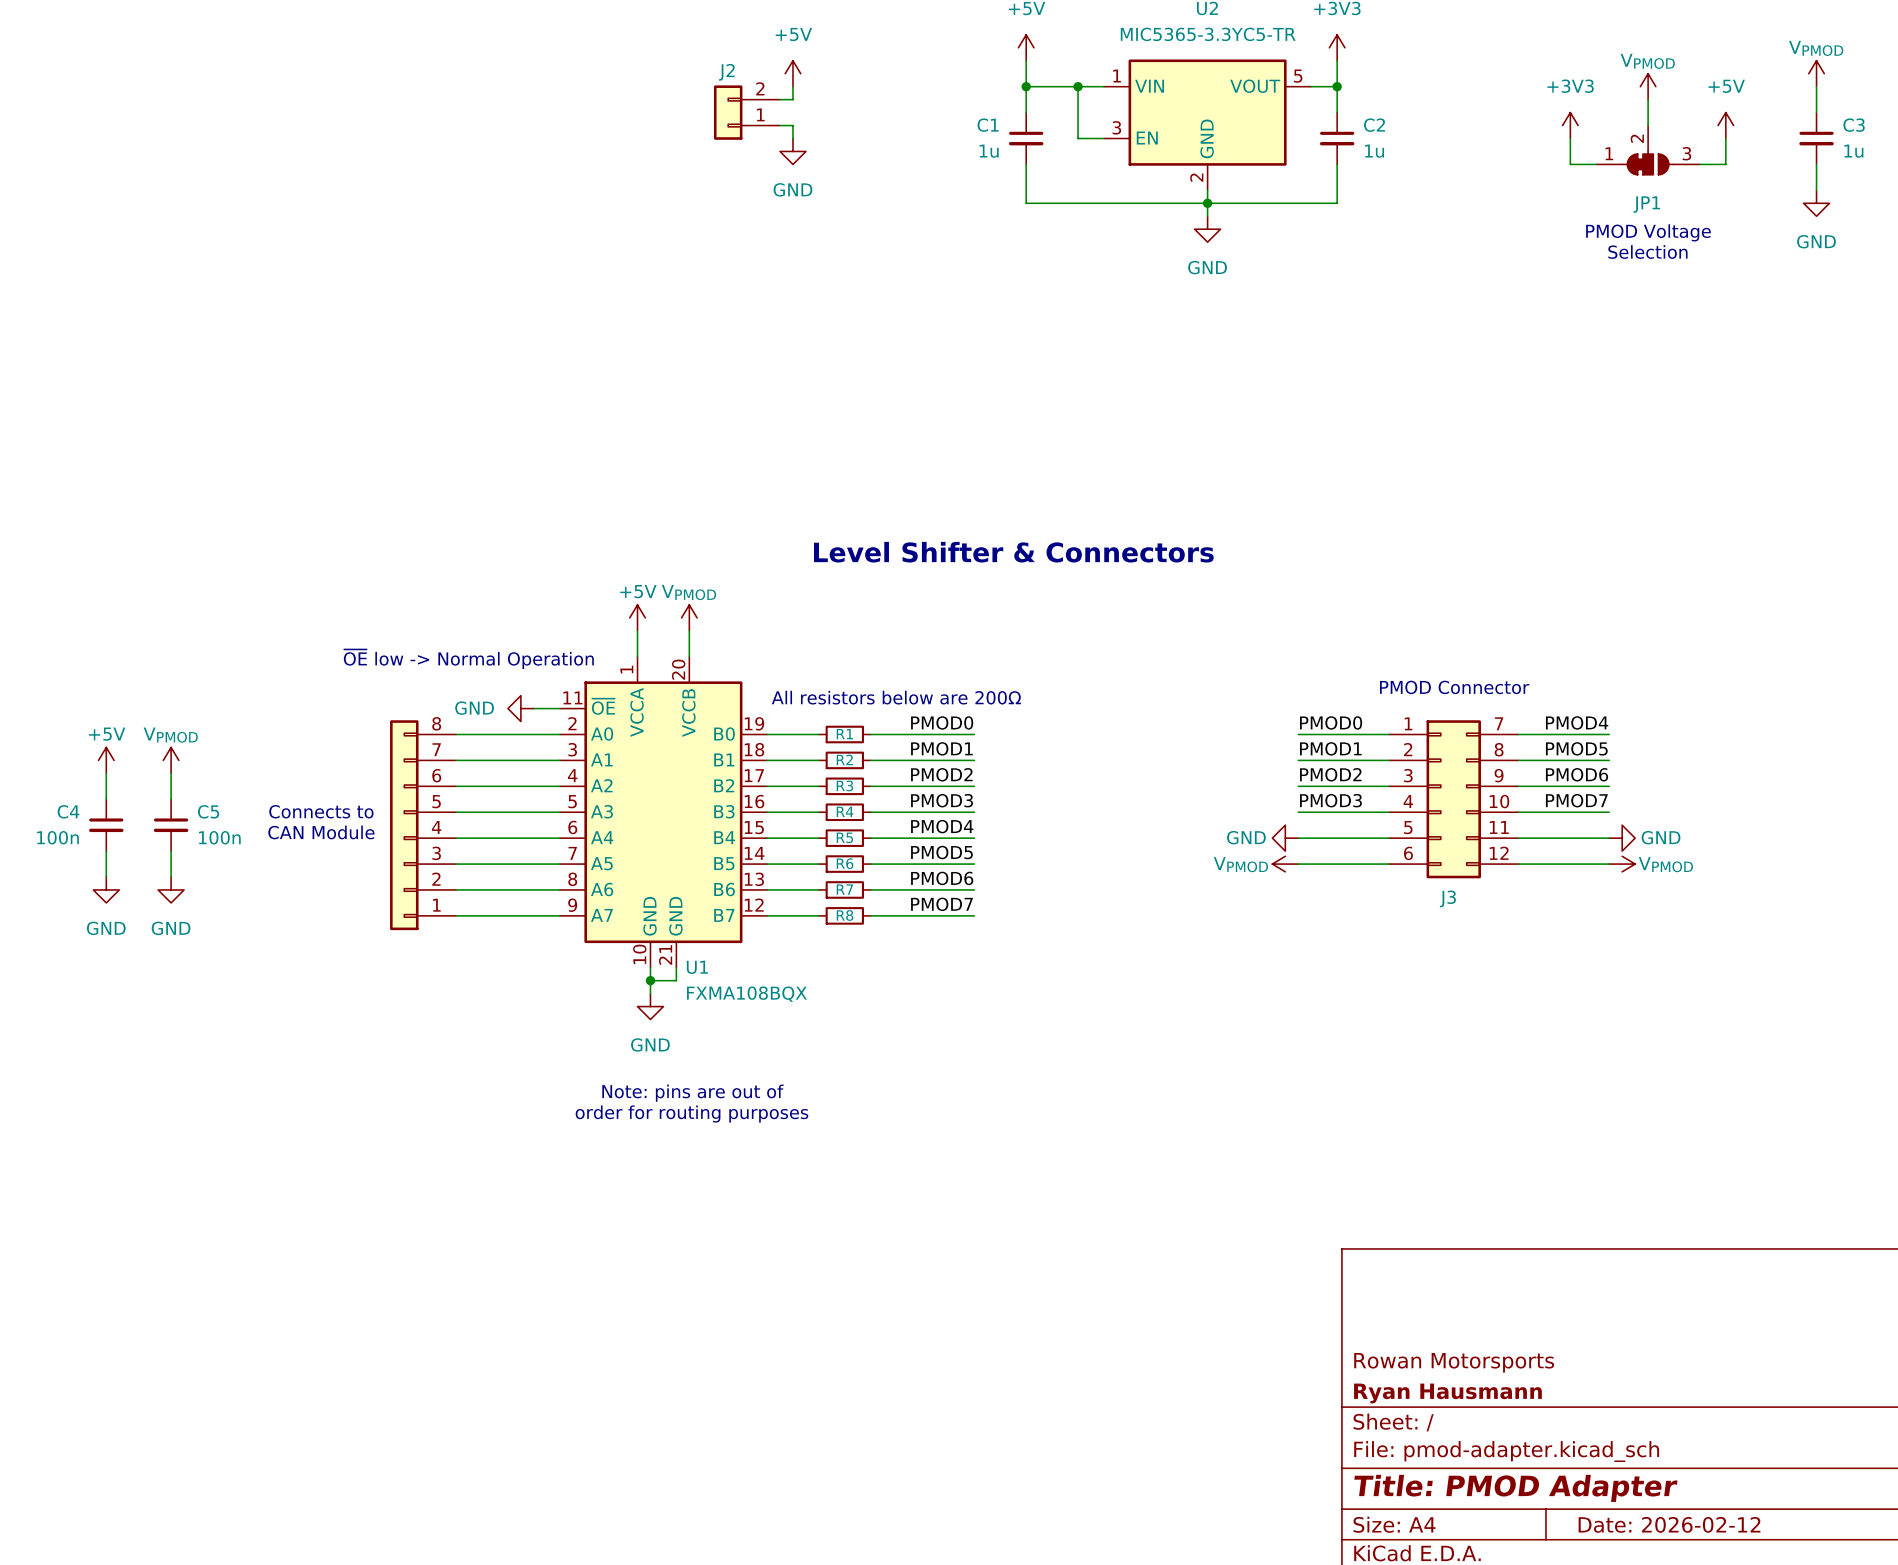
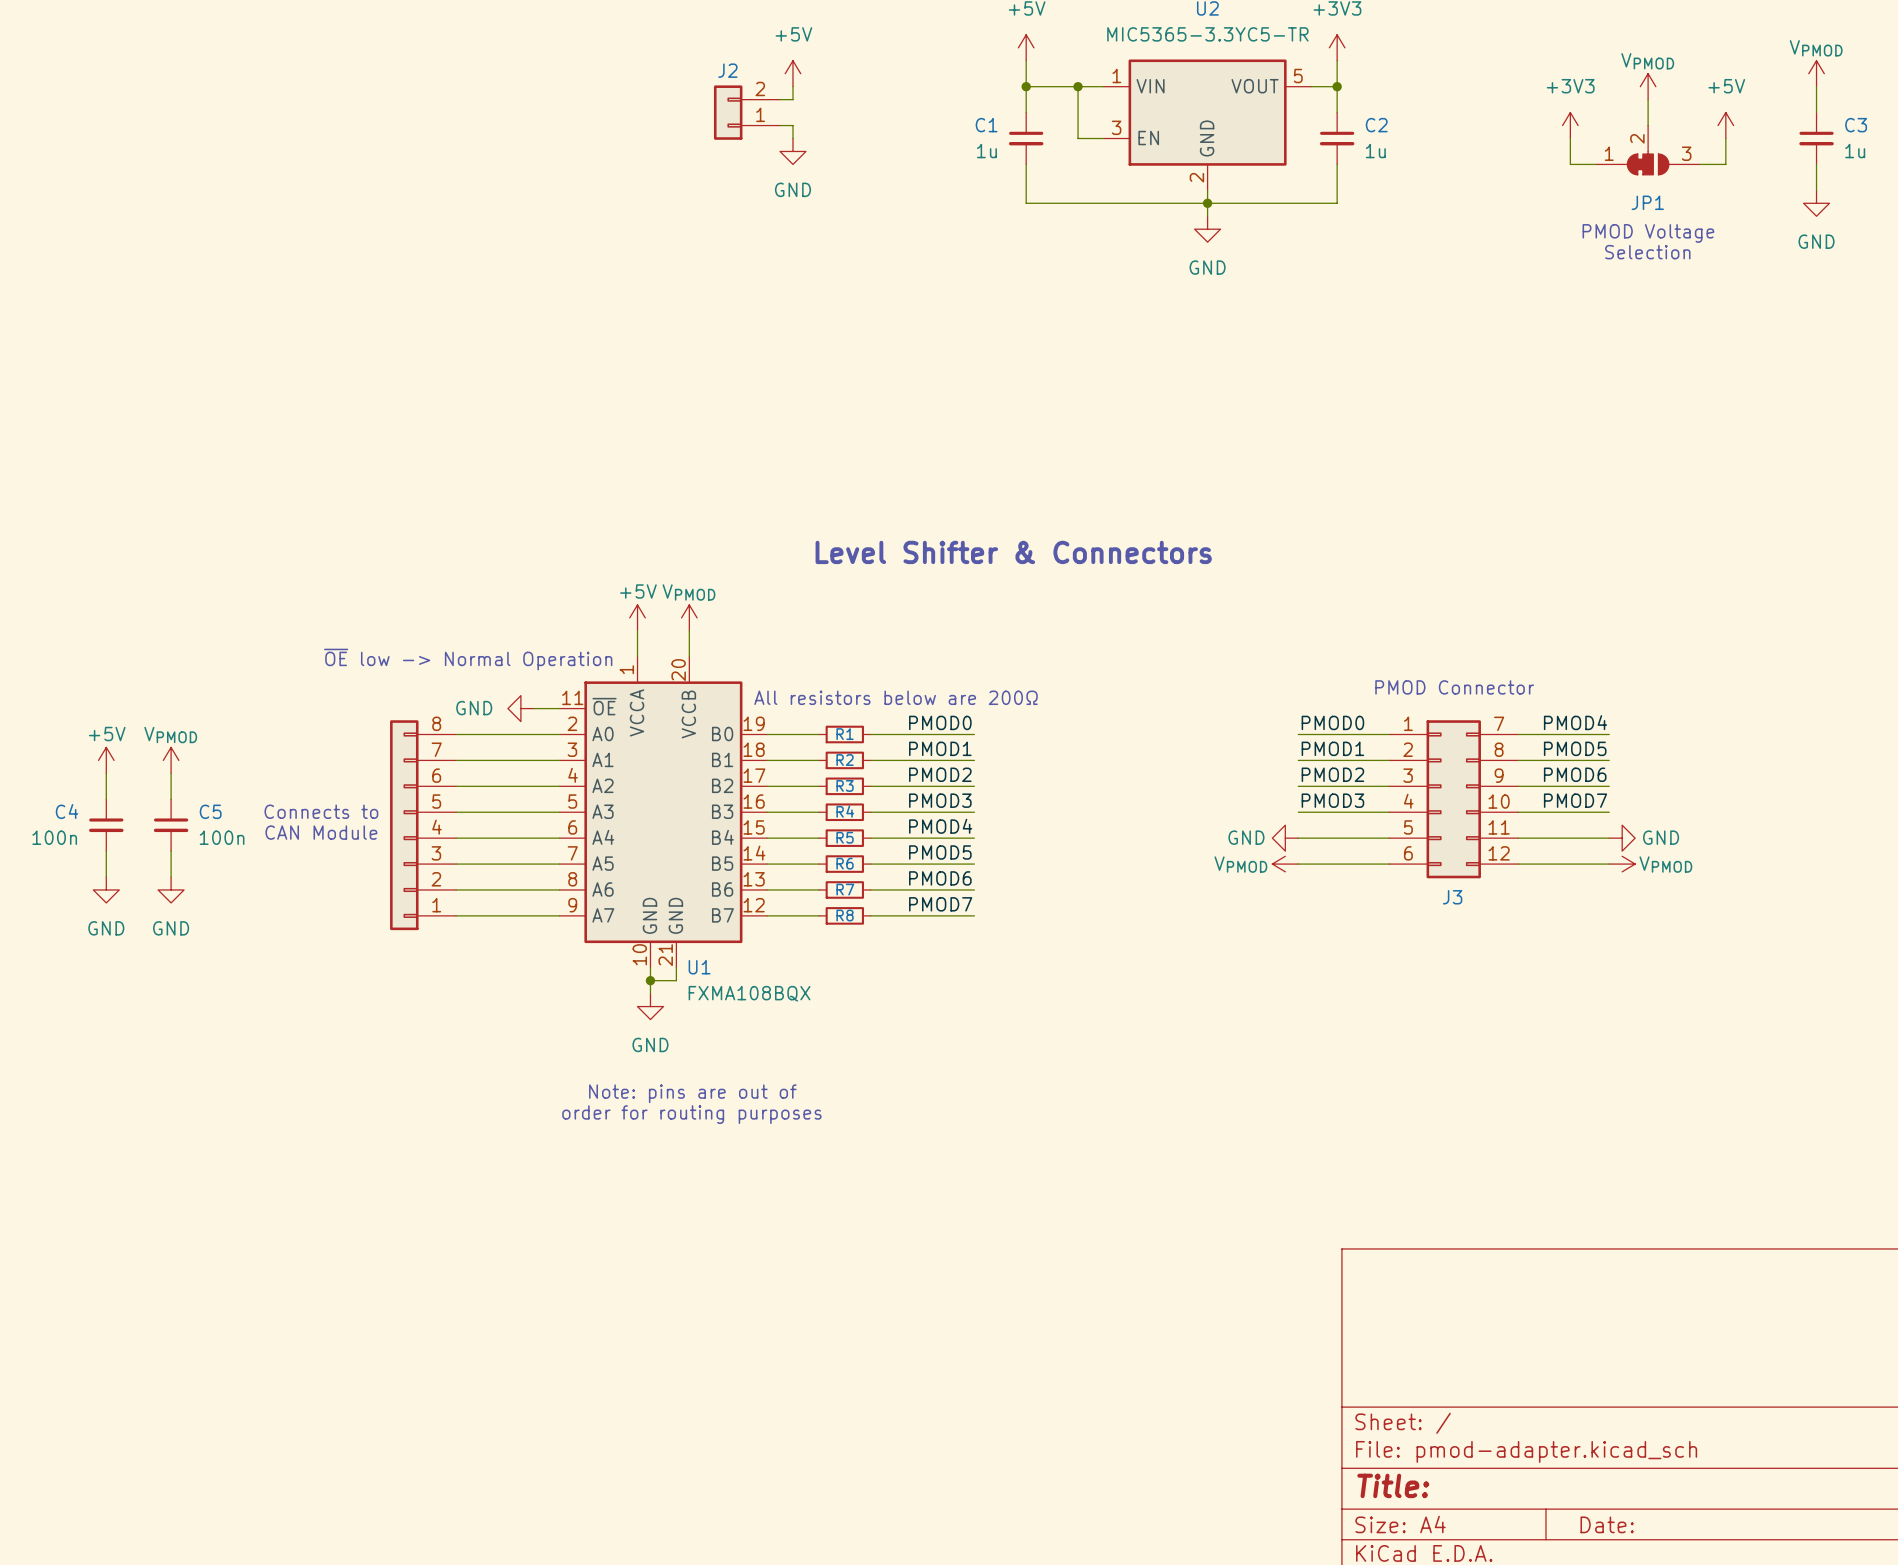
title block: Rowan Motorsports (1454, 1362) -> none
title block: Ryan Hausmann (1447, 1393) -> none
title block: Title: PMOD Adapter (1515, 1488) -> Title: (1393, 1485)
title block: Date: 2026-02-12 (1669, 1524) -> Date: (1607, 1524)

